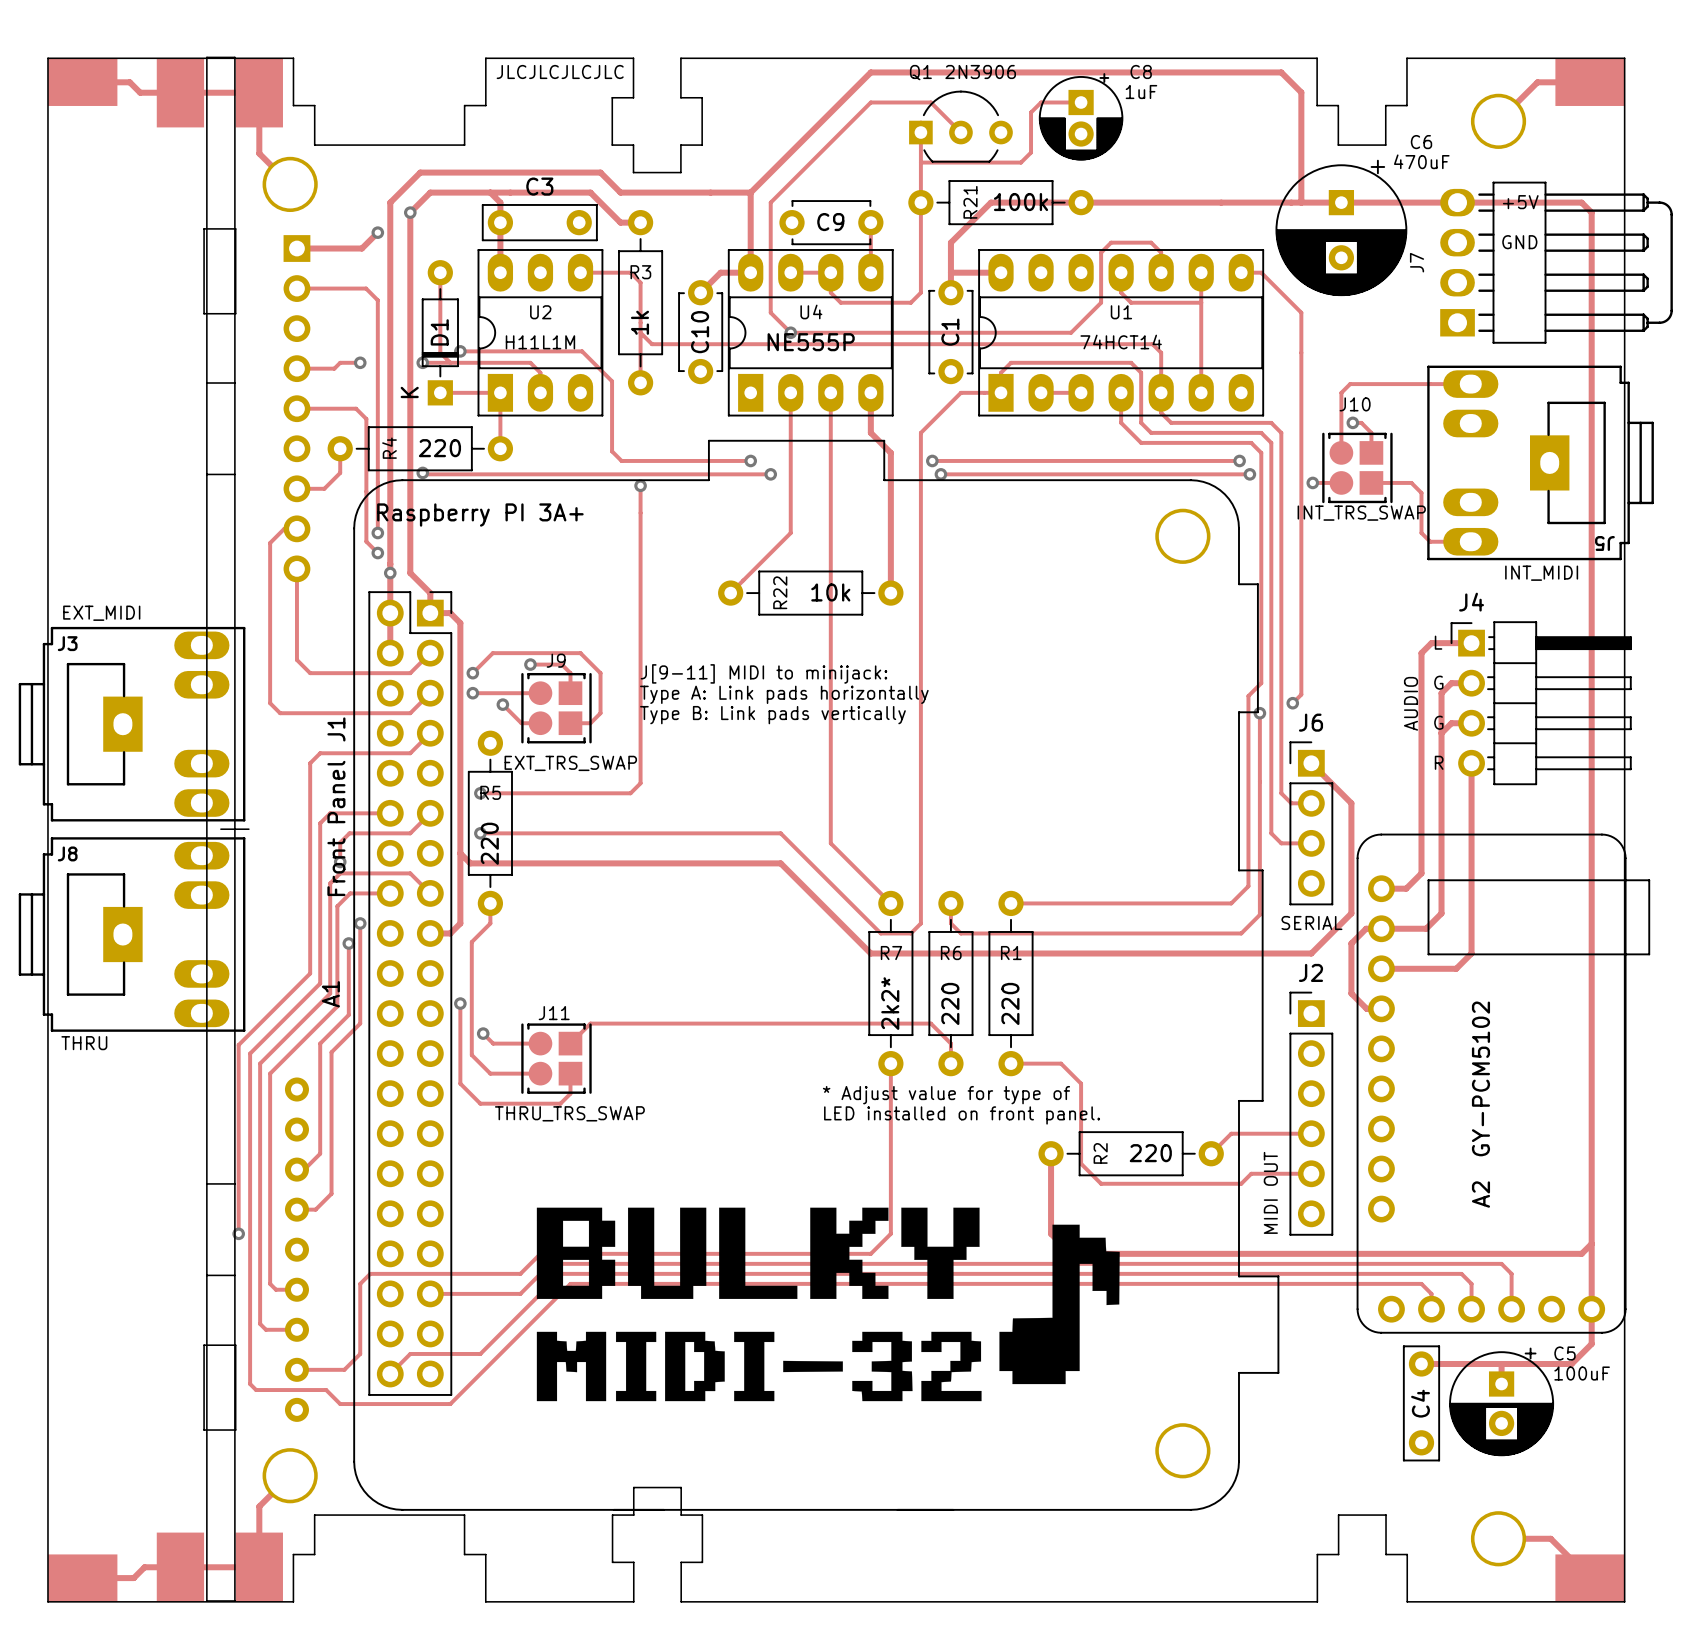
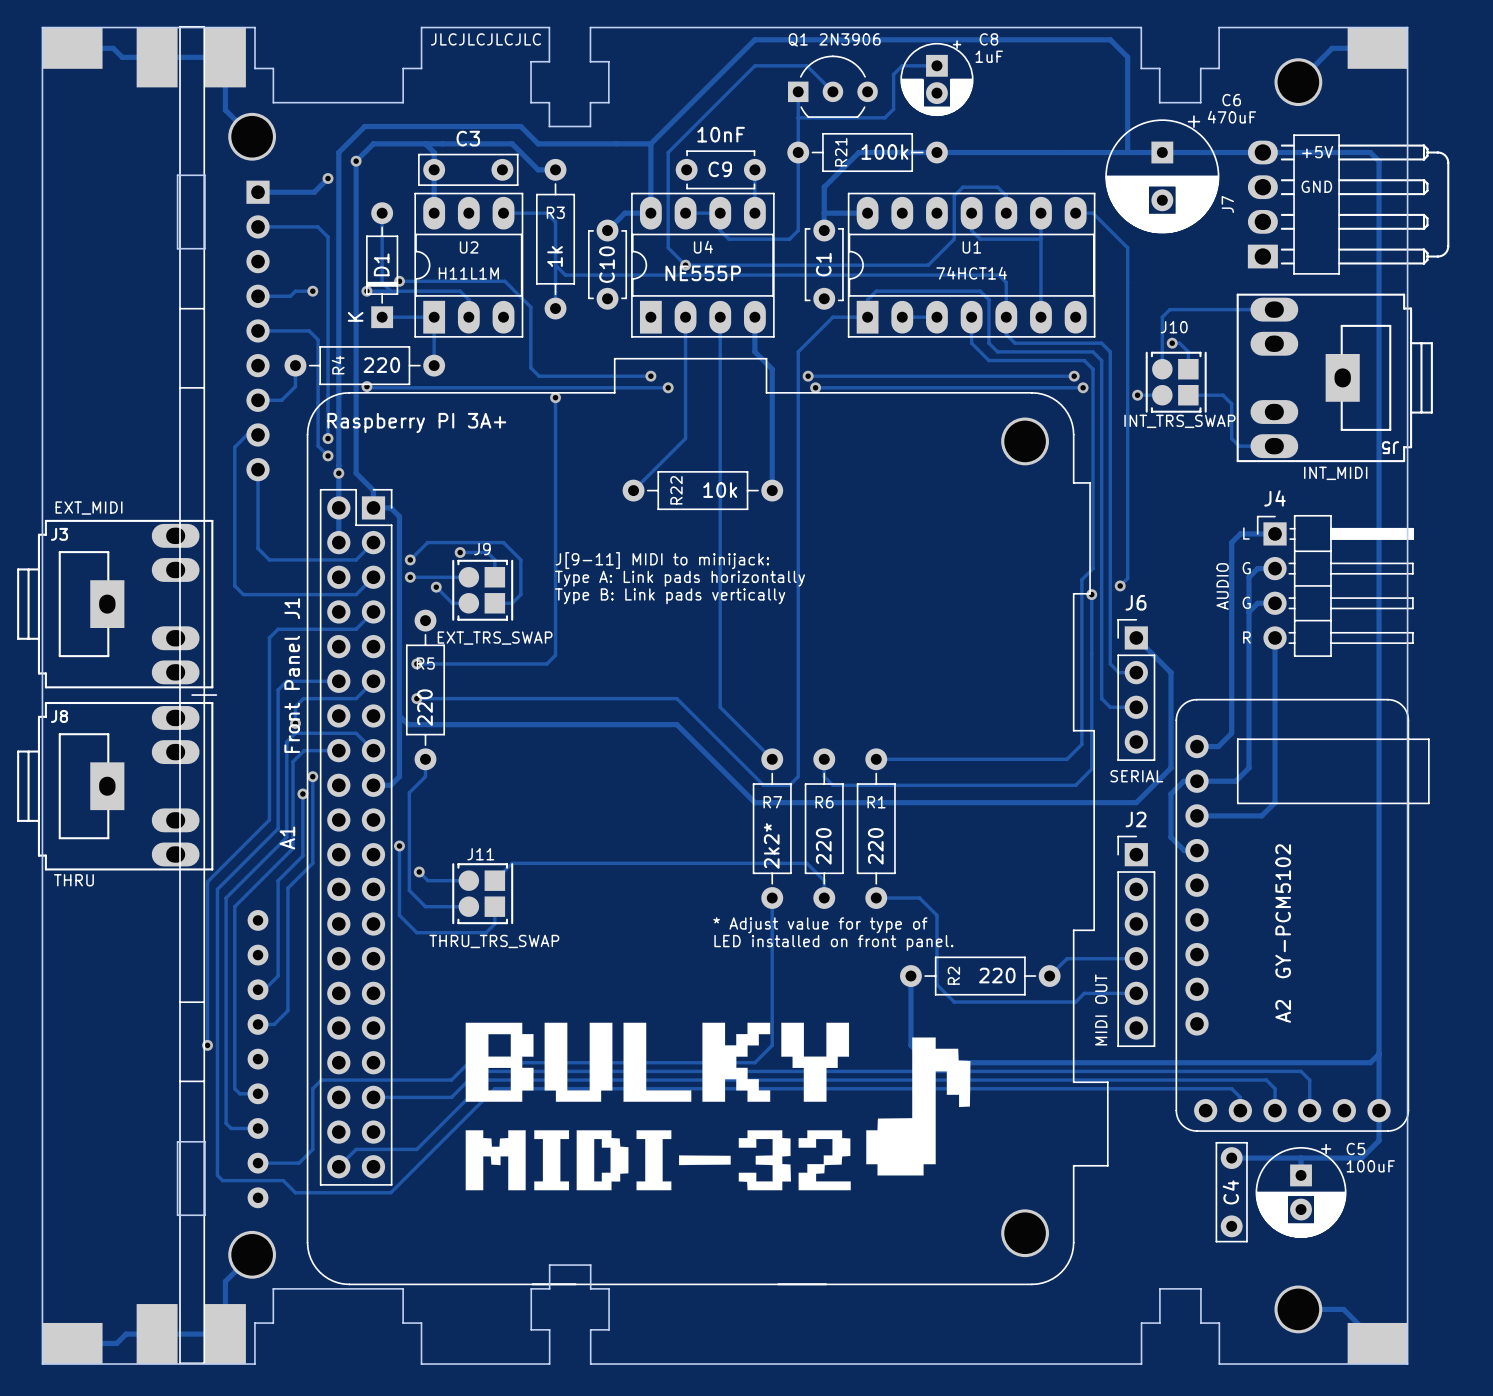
C9 value: none -> 10nF (721, 134)

